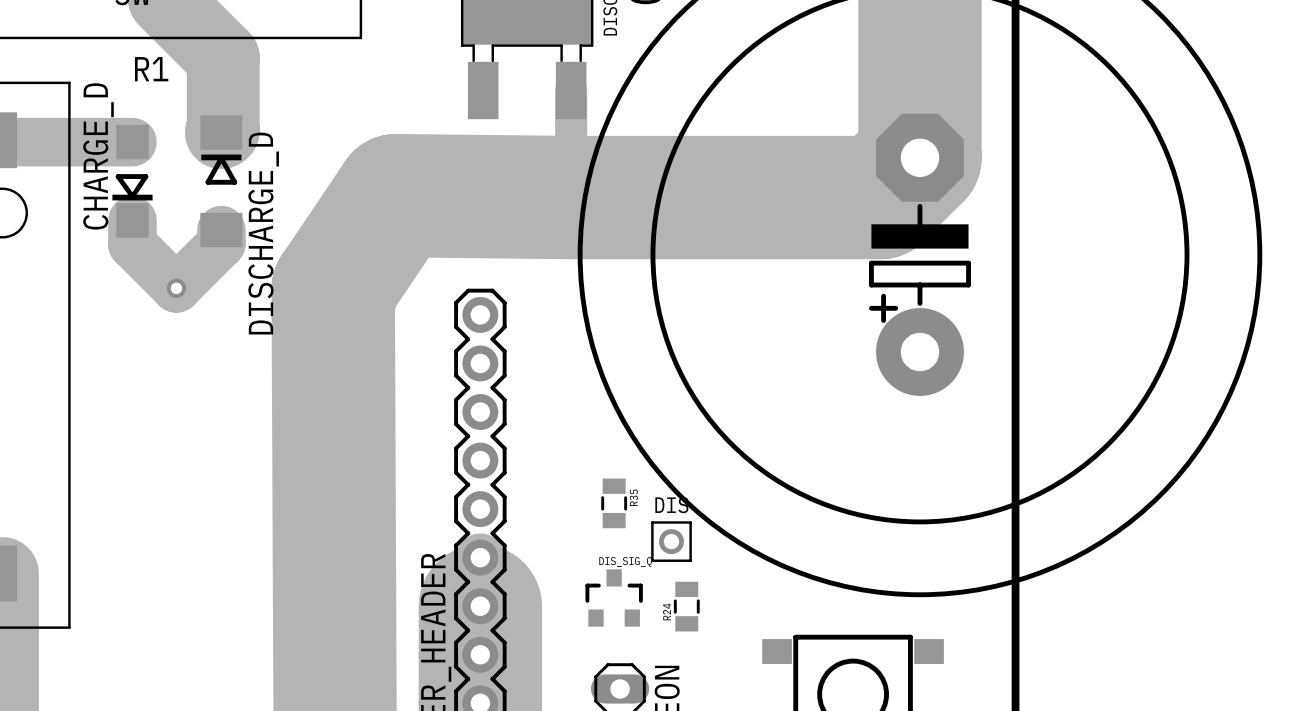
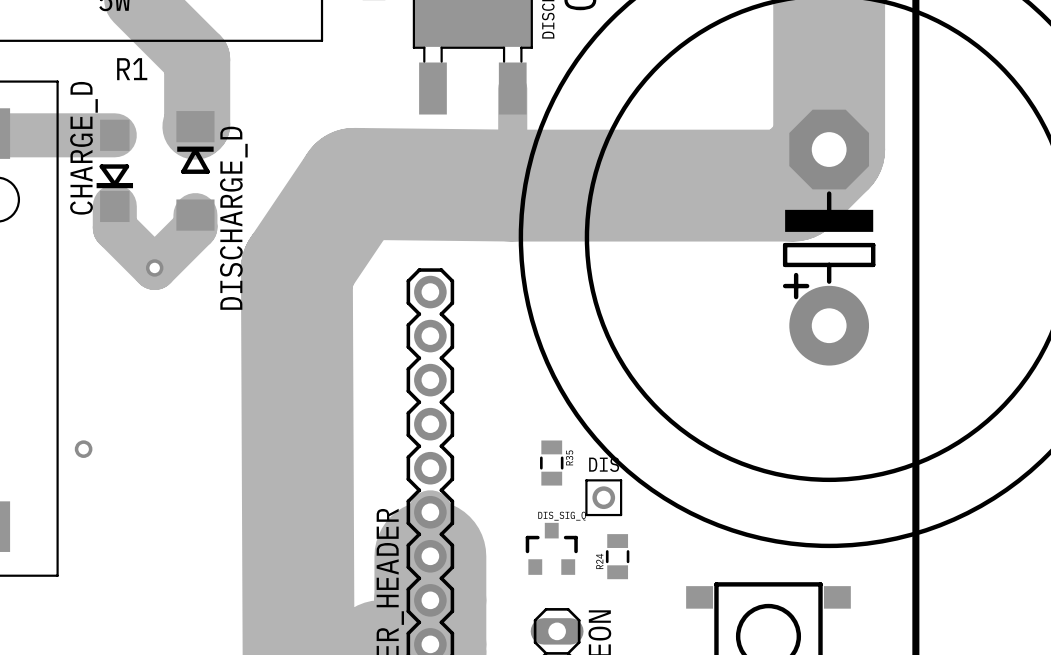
via: none -> (83, 449)

